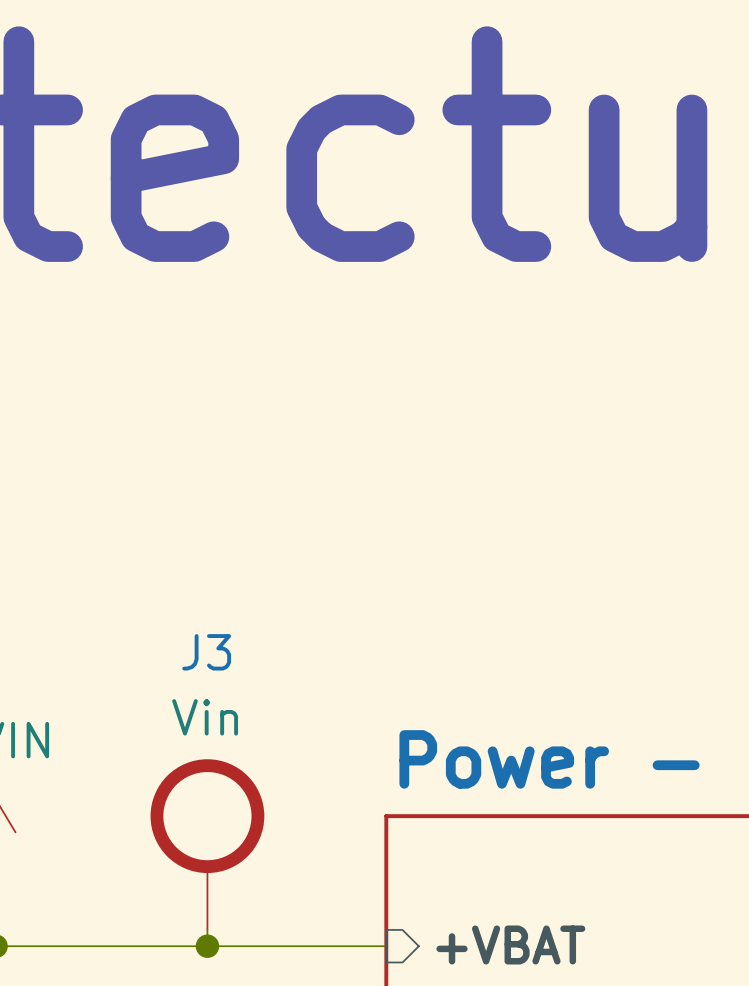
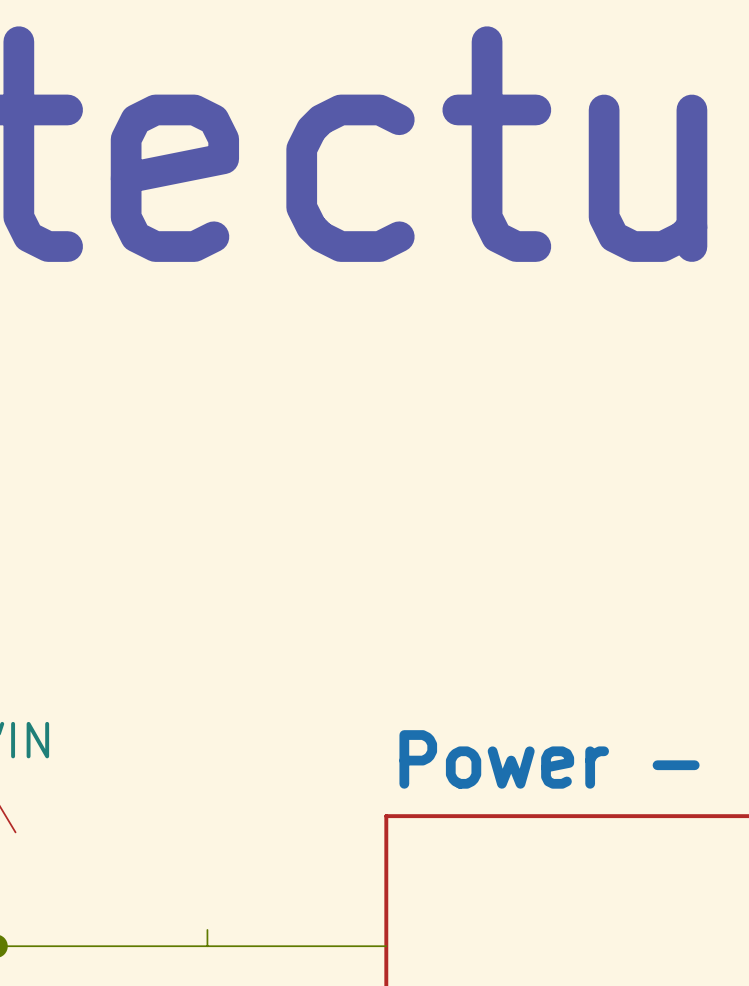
J3: Vin (207, 844) -> none
sheet pin: +VBAT (510, 945) -> none
junction: (207, 946) -> none

